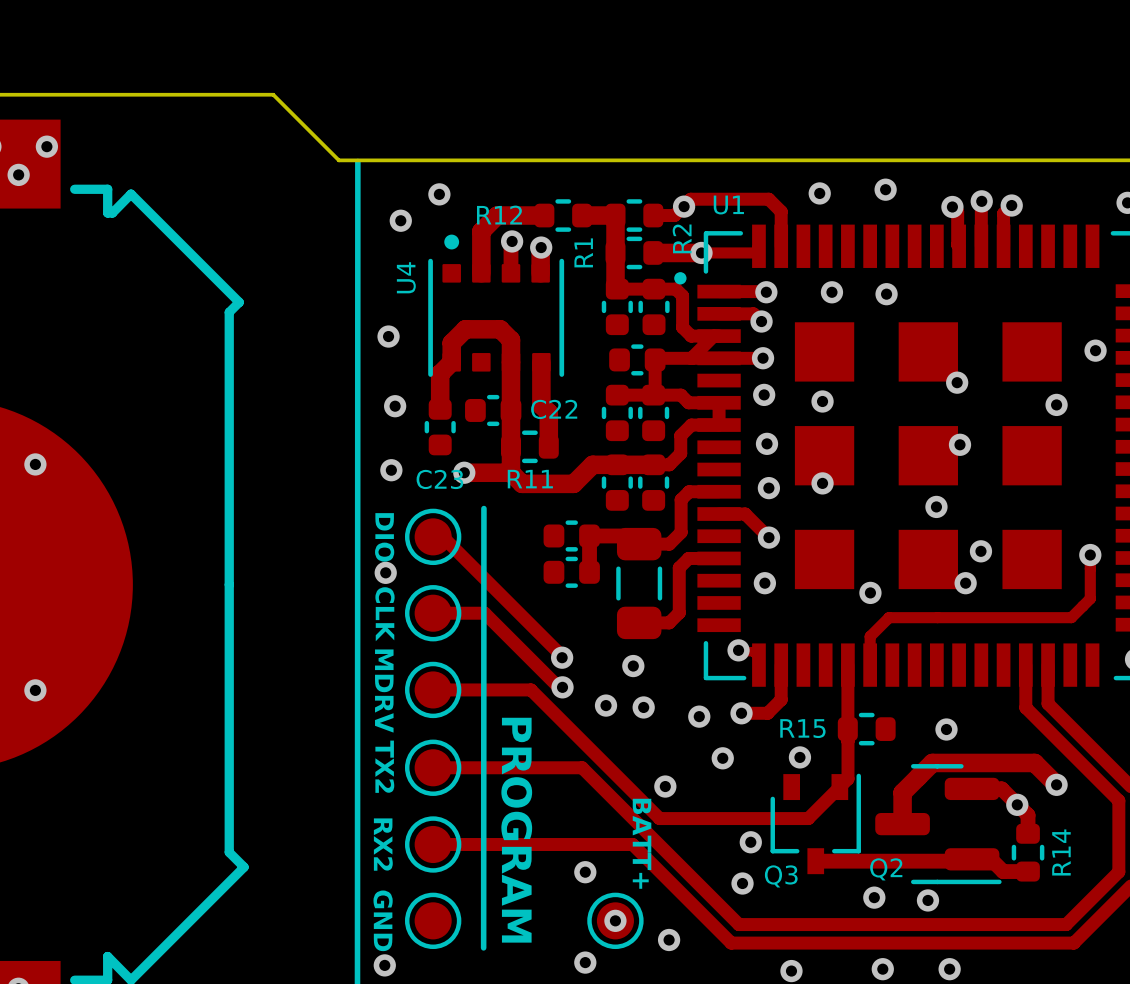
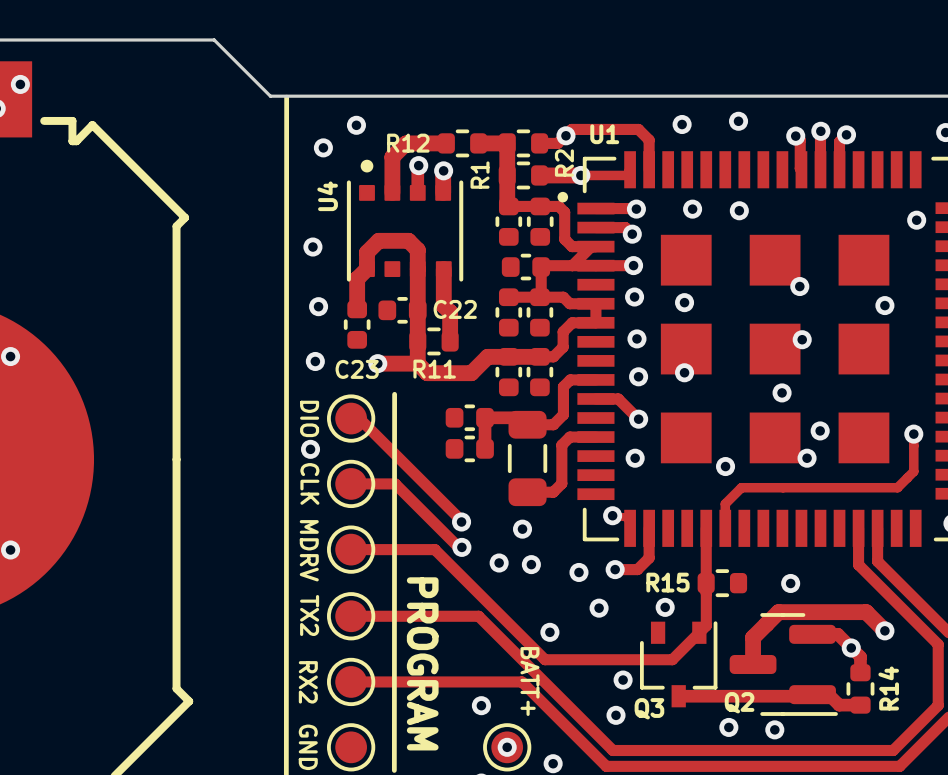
via position: (1095, 350) -> (916, 220)

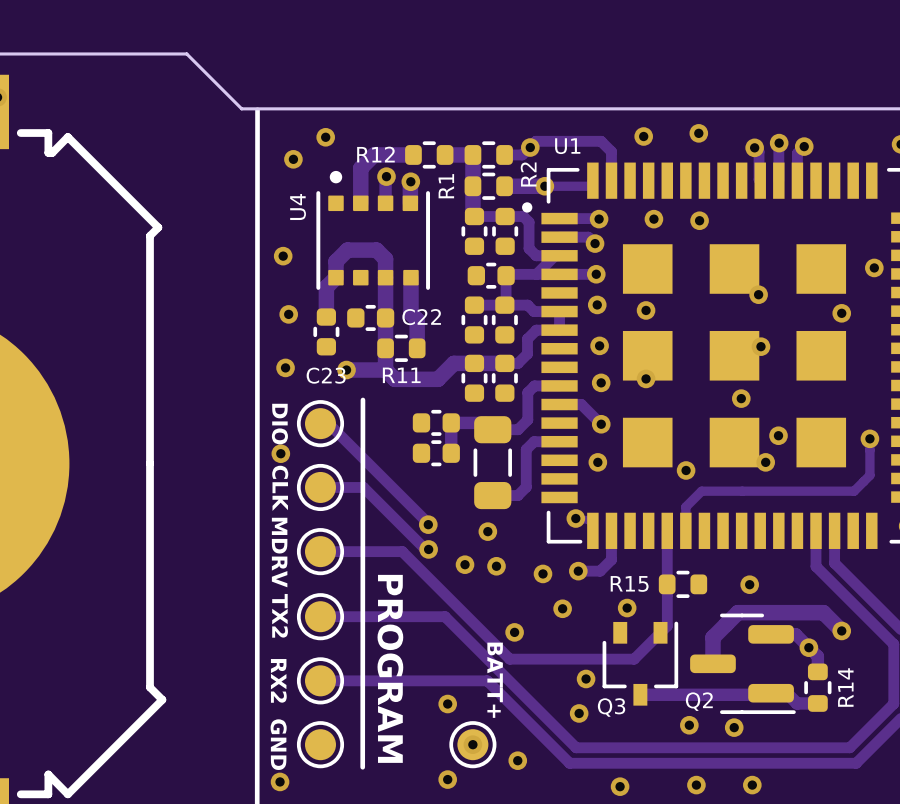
via position: (916, 220) -> (874, 267)

